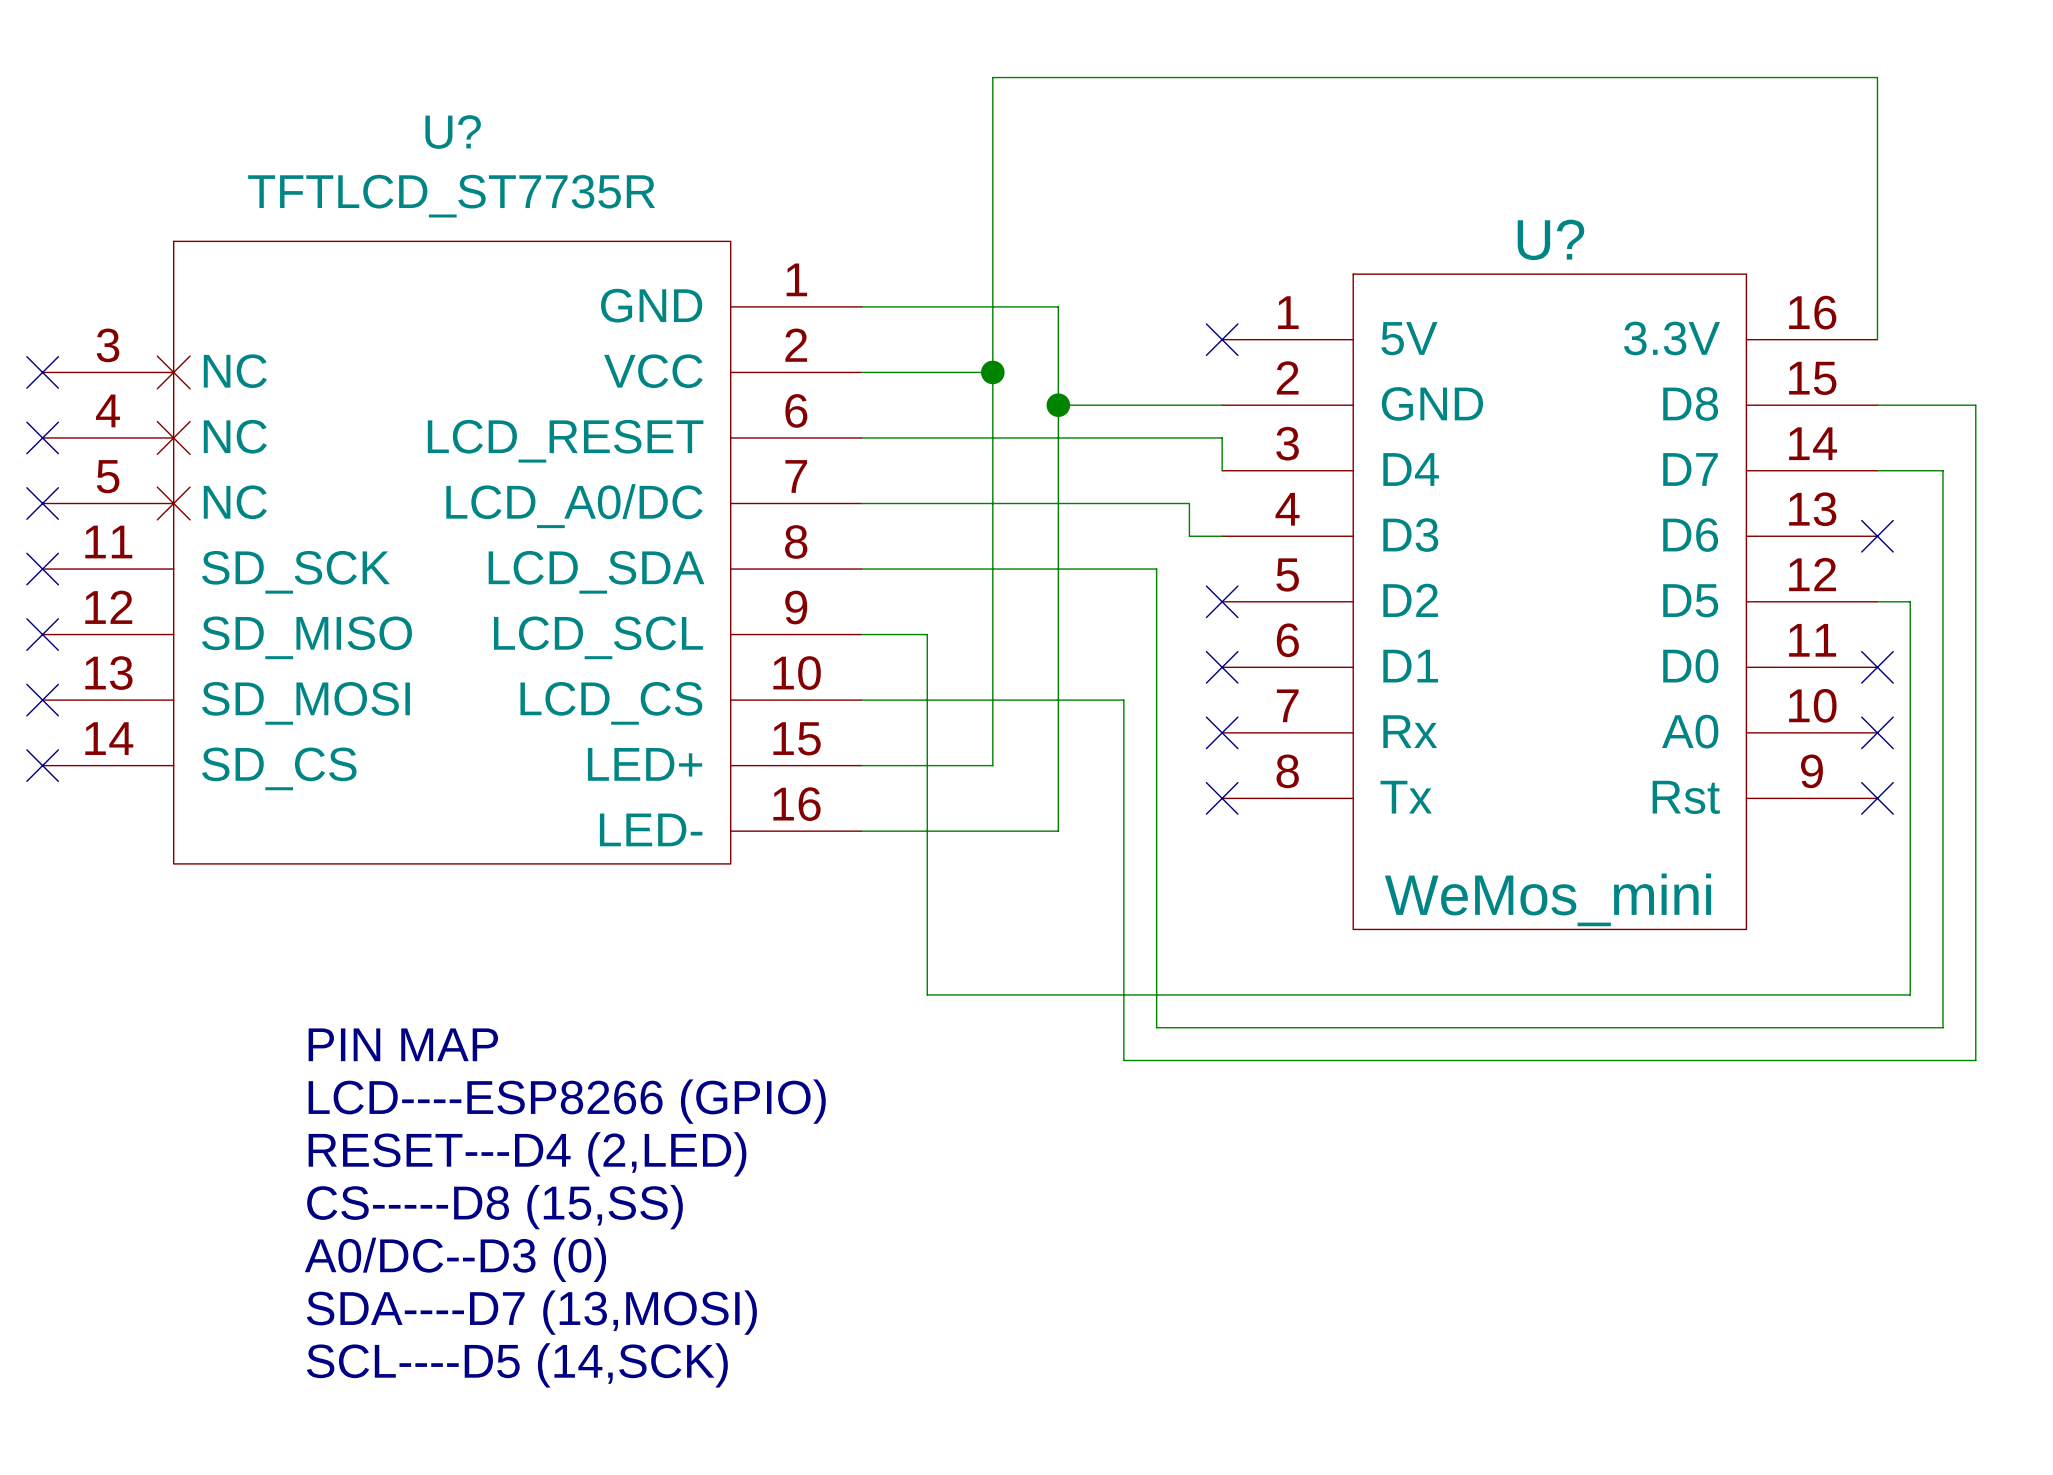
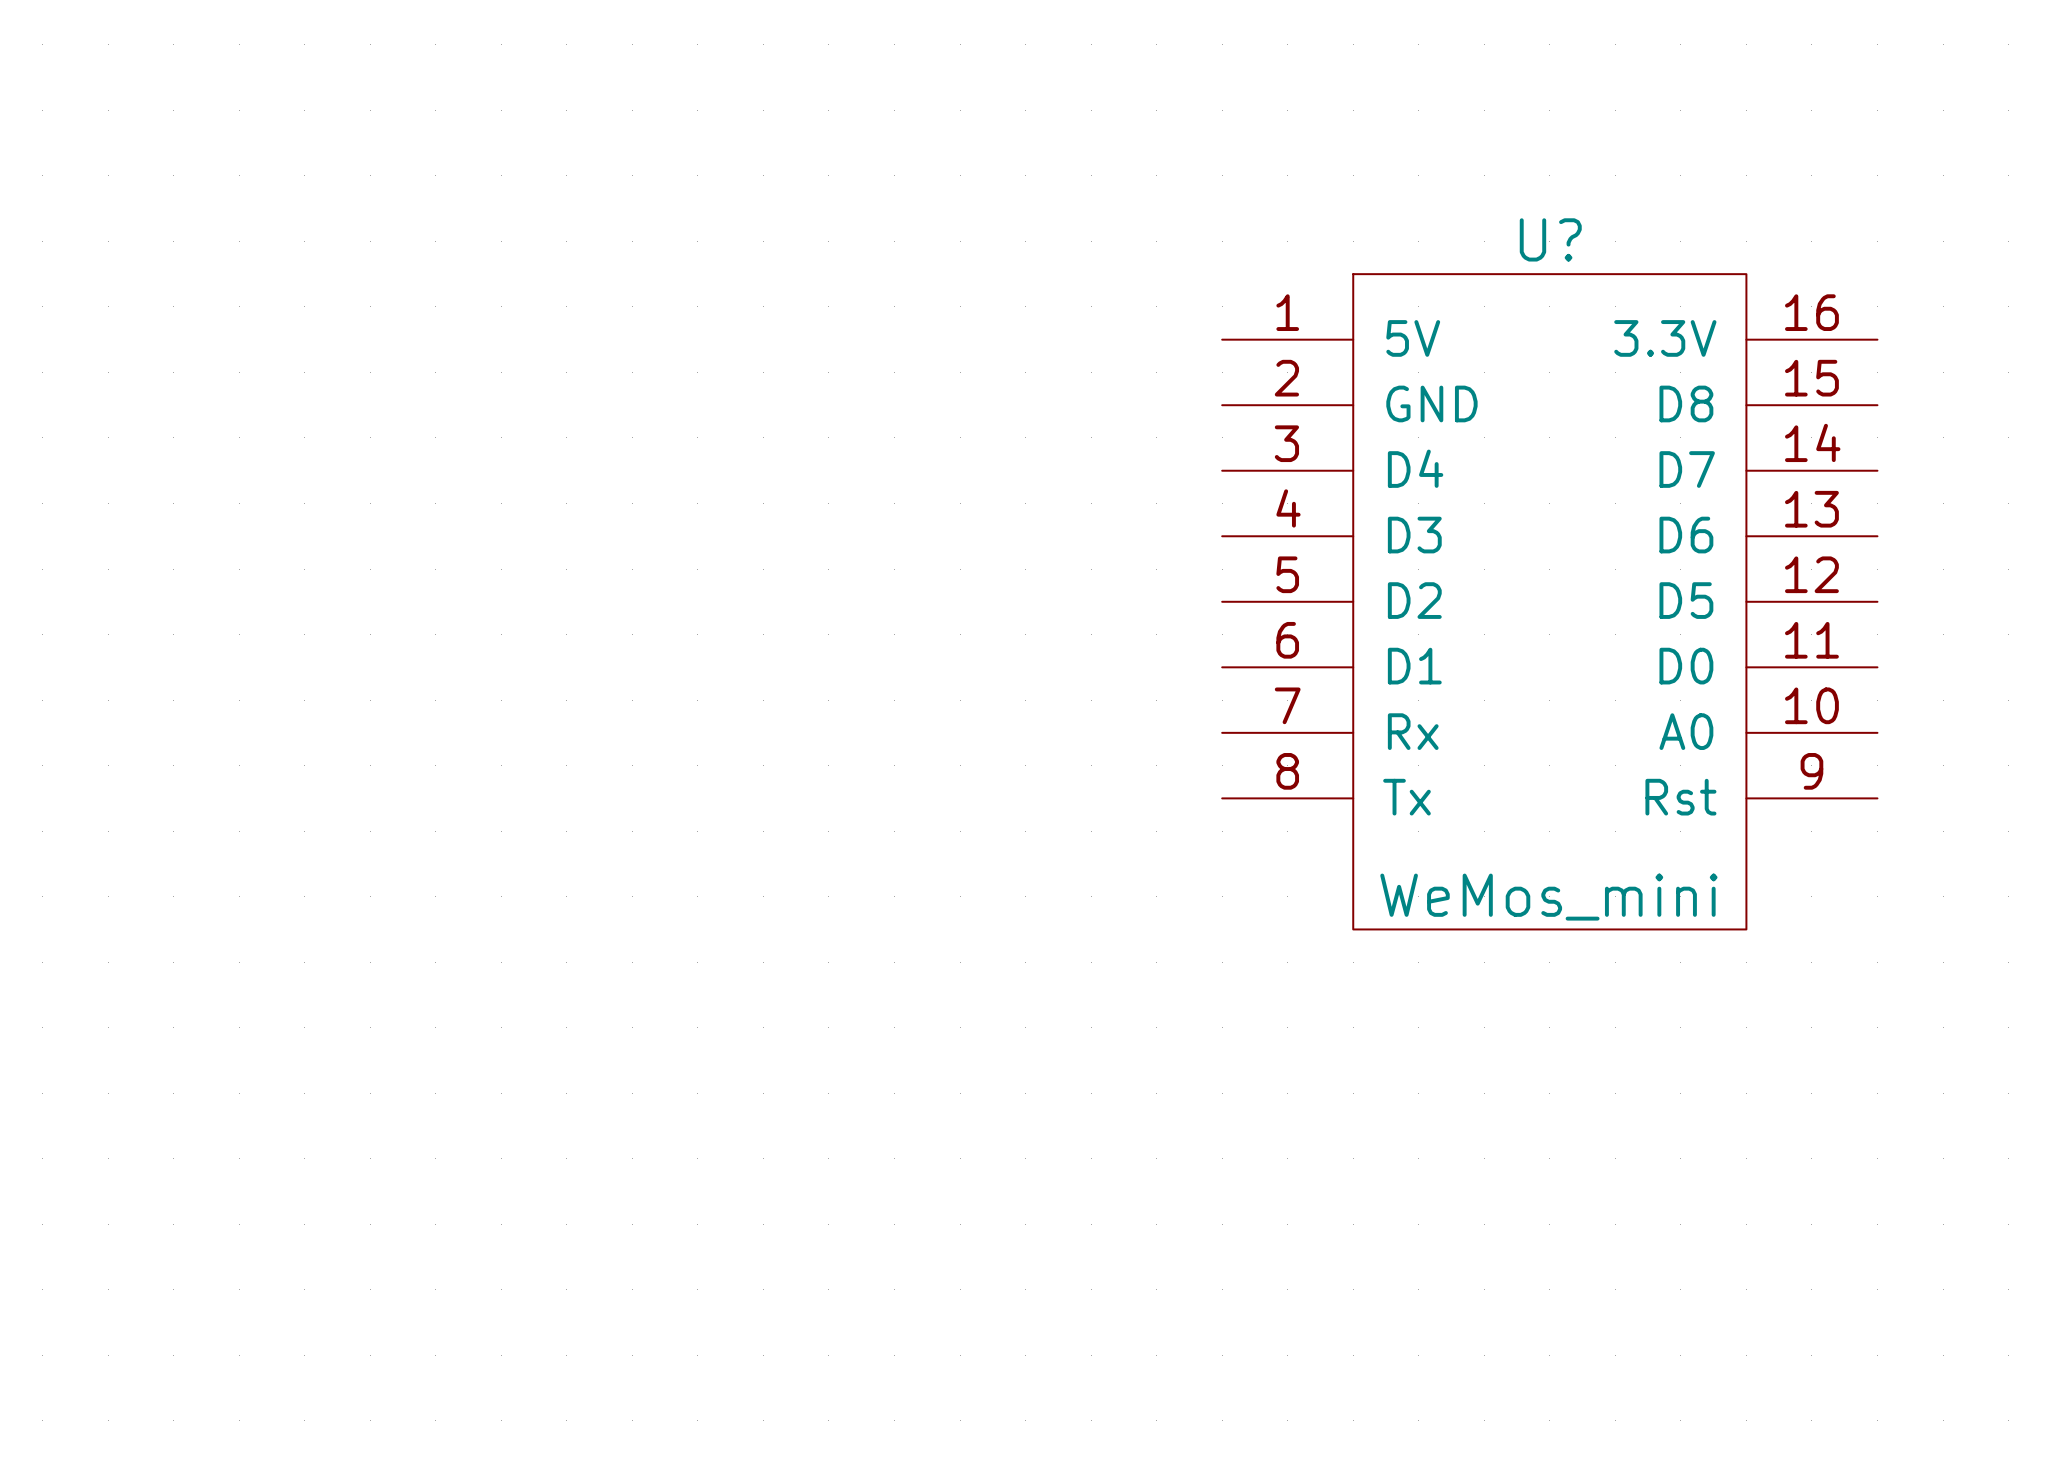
wire: (861, 306) (1058, 306) (1058, 831) (861, 831) -> none
no-connect mark: (1222, 339) -> none
wire: (1877, 339) (1877, 77) (992, 77) (992, 765) (861, 765) -> none
no-connect mark: (42, 372) -> none
wire: (861, 372) (992, 372) -> none
junction: (992, 372) -> none
wire: (1058, 405) (1222, 405) -> none
junction: (1058, 405) -> none
wire: (1877, 405) (1975, 405) (1975, 1060) (1123, 1060) (1123, 700) (861, 700) -> none
no-connect mark: (42, 437) -> none
wire: (861, 437) (1222, 437) (1222, 470) -> none
wire: (1877, 470) (1943, 470) (1943, 1027) (1156, 1027) (1156, 569) (861, 569) -> none
no-connect mark: (42, 503) -> none
wire: (861, 503) (1189, 503) (1189, 536) (1222, 536) -> none
no-connect mark: (1877, 536) -> none
U?: TFTLCD_ST7735R (452, 552) -> none
no-connect mark: (42, 569) -> none
no-connect mark: (1222, 601) -> none
wire: (1877, 601) (1910, 601) (1910, 994) (927, 994) (927, 634) (861, 634) -> none
no-connect mark: (42, 634) -> none
no-connect mark: (1222, 667) -> none
no-connect mark: (1877, 667) -> none
no-connect mark: (42, 700) -> none
no-connect mark: (1222, 732) -> none
no-connect mark: (1877, 732) -> none
no-connect mark: (42, 765) -> none
no-connect mark: (1222, 798) -> none
no-connect mark: (1877, 798) -> none
text: PIN MAP (403, 1044) -> none
text: LCD----ESP8266 (GPIO) (567, 1101) -> none
text: RESET---D4 (2,LED) (527, 1154) -> none
text: CS-----D8 (15,SS) (494, 1207) -> none
text: A0/DC--D3 (0) (455, 1259) -> none
text: SDA----D7 (13,MOSI) (531, 1312) -> none
text: SCL----D5 (14,SCK) (517, 1365) -> none

